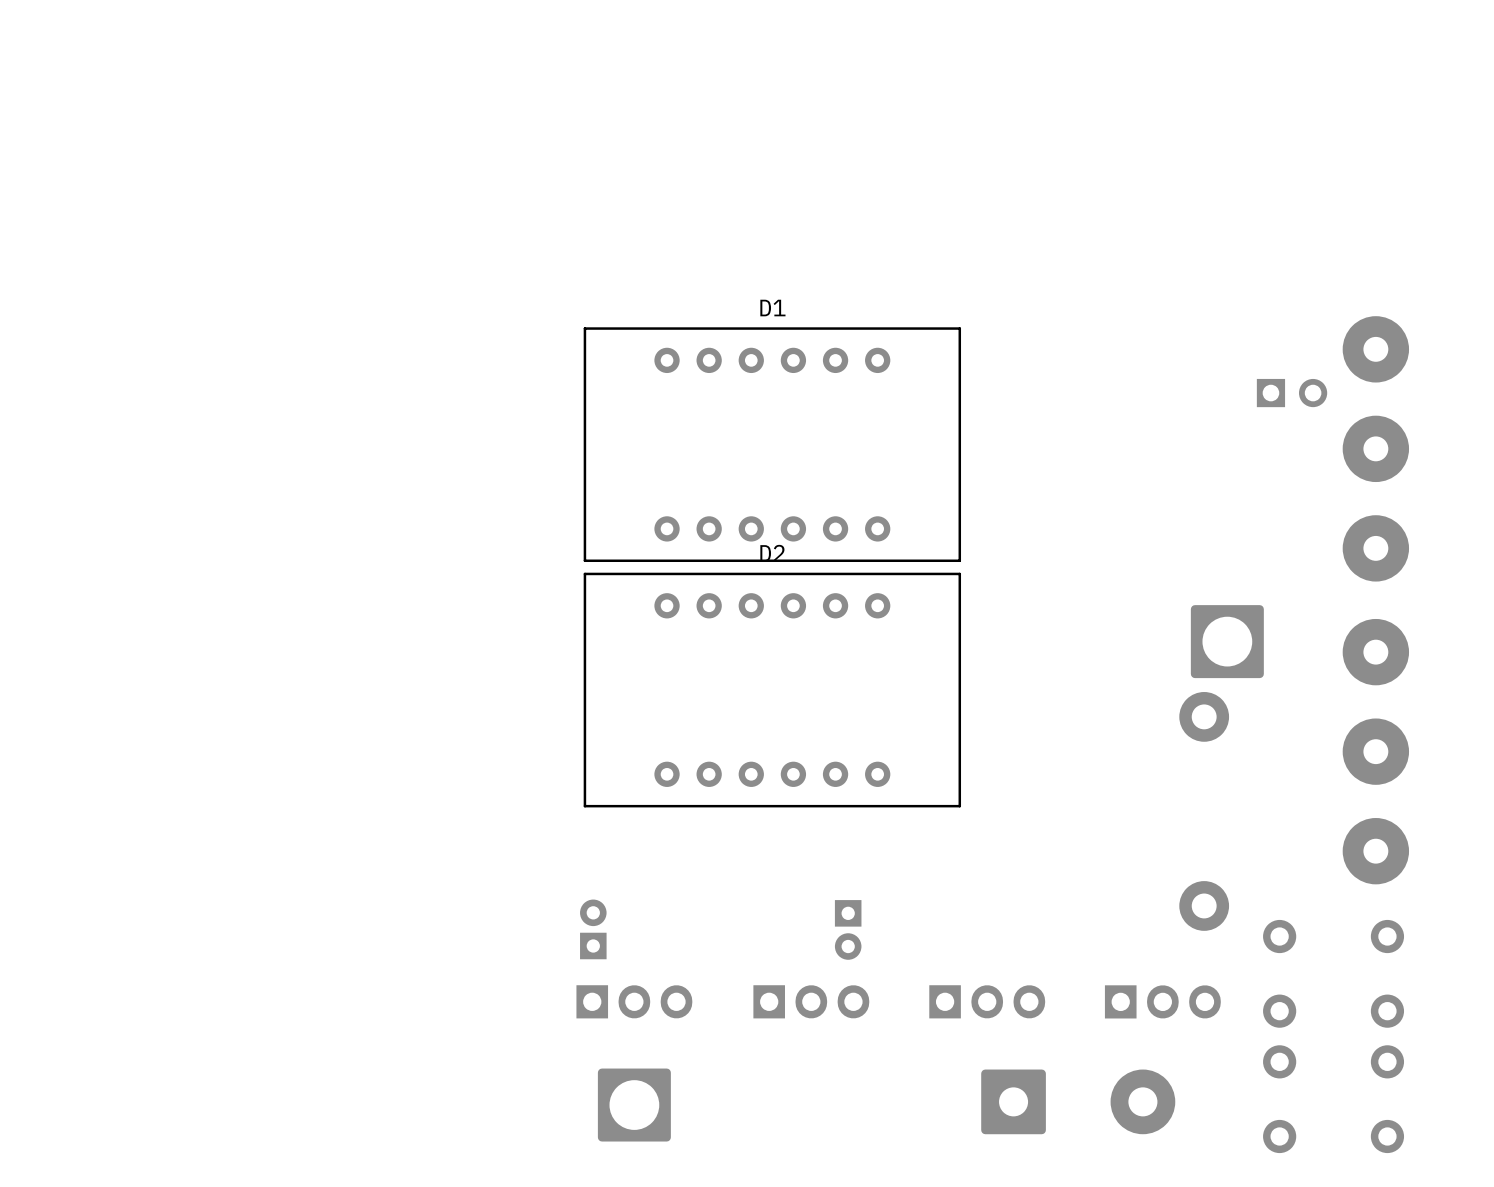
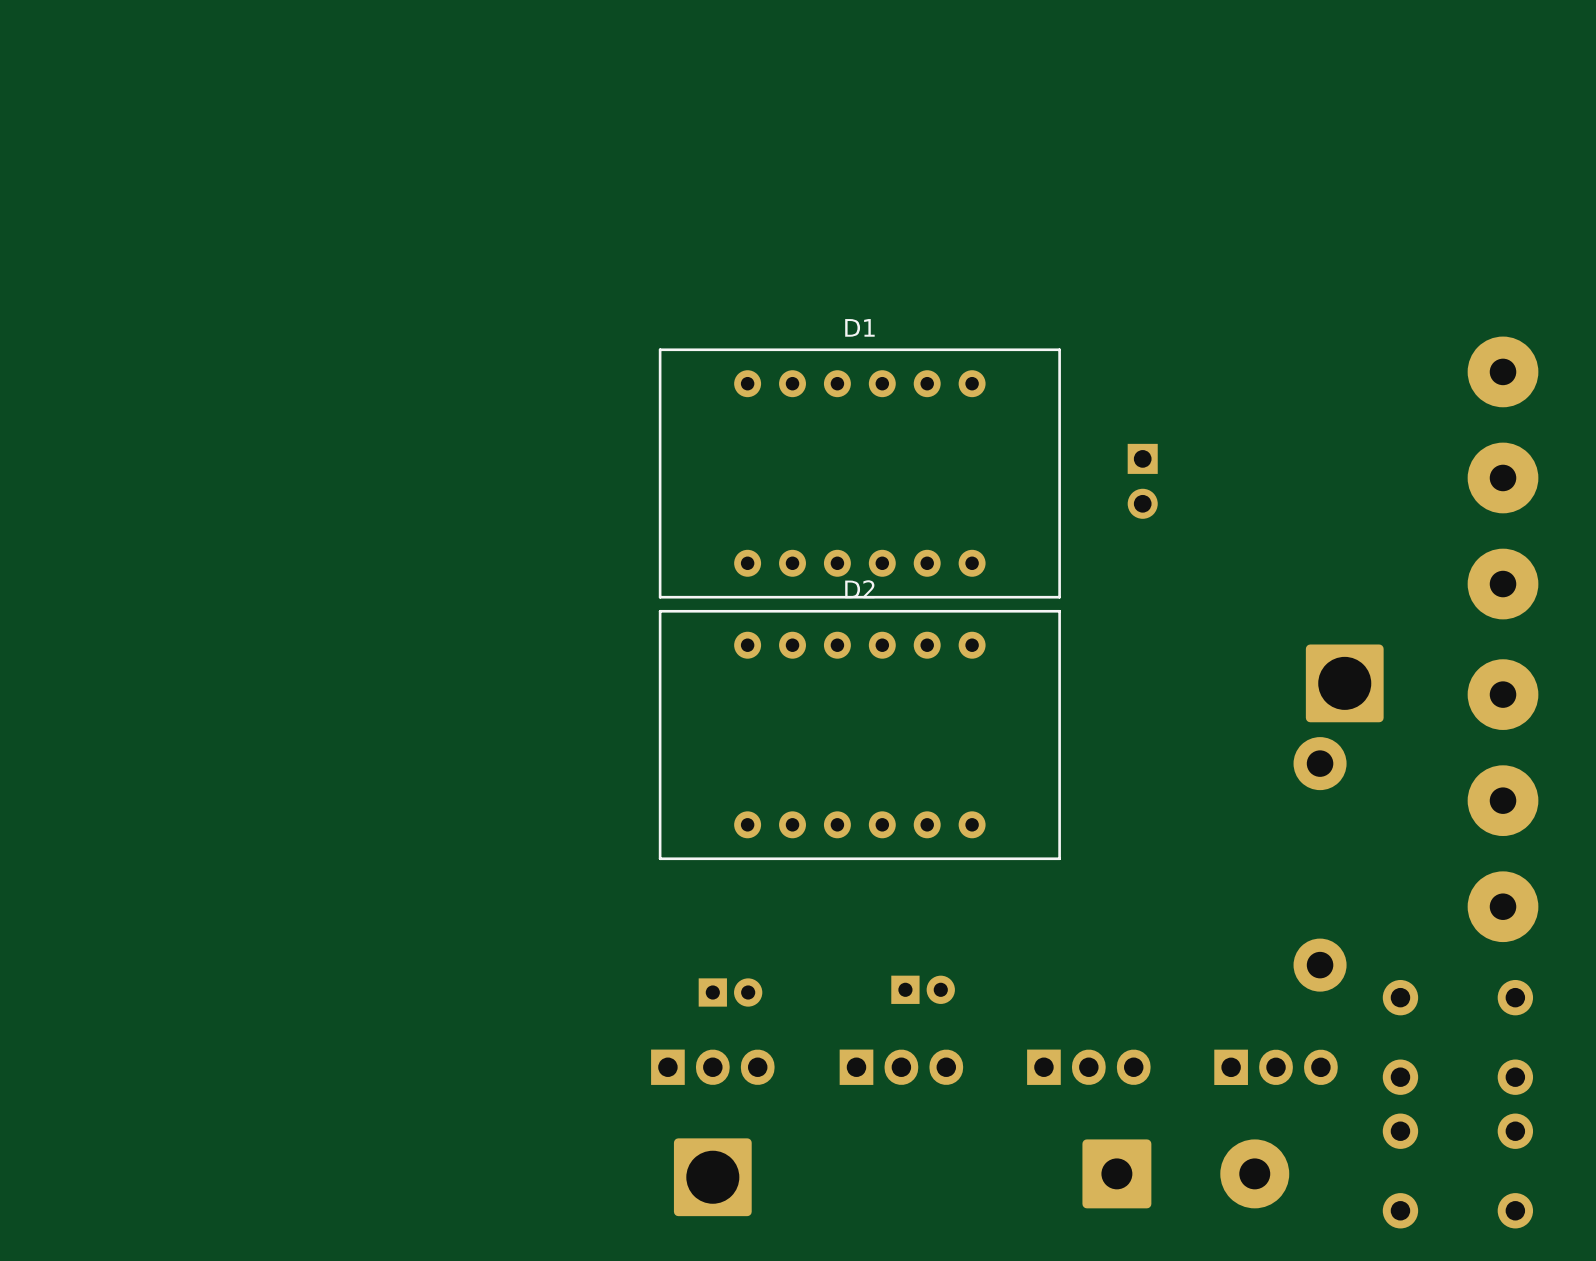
part rotation: 0° (1292, 393) -> 90° clockwise (1142, 481)
part position: (1292, 393) -> (1142, 481)
part rotation: 0° (593, 929) -> 90° clockwise (730, 992)
part position: (593, 929) -> (730, 992)
part rotation: 0° (848, 929) -> 90° counterclockwise (923, 989)

